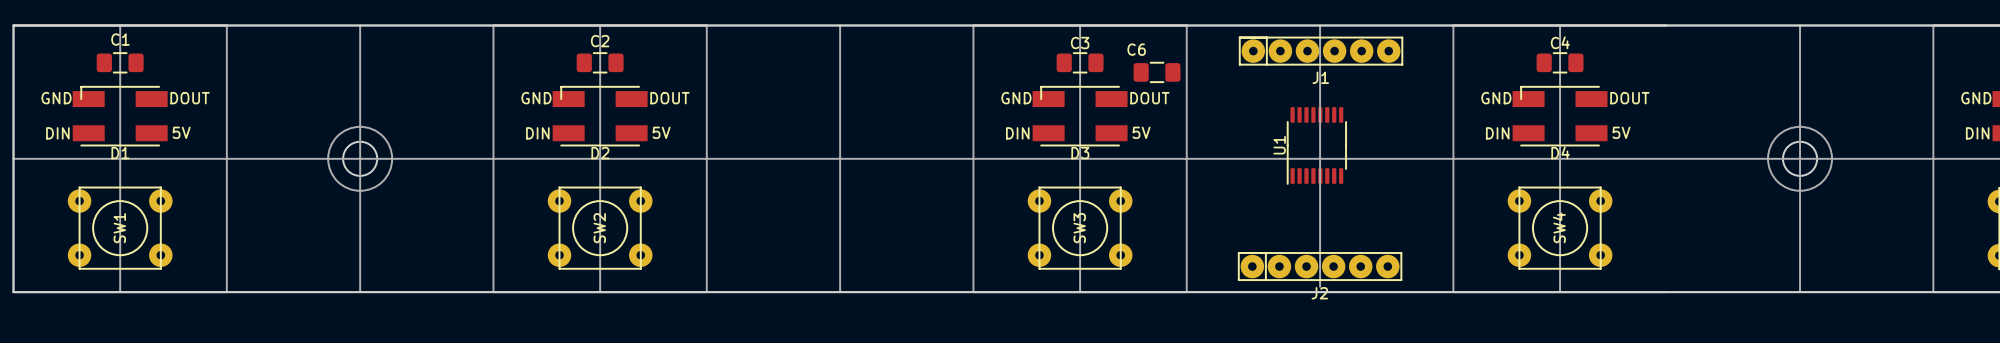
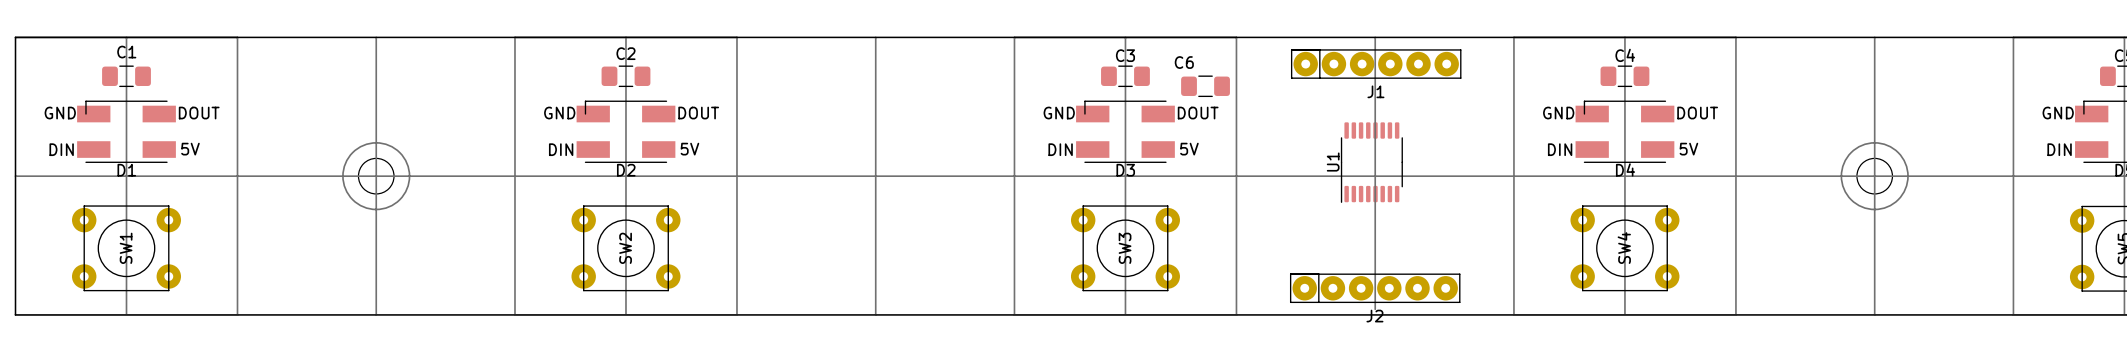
line: none -> (1735, 37) (1735, 314)

